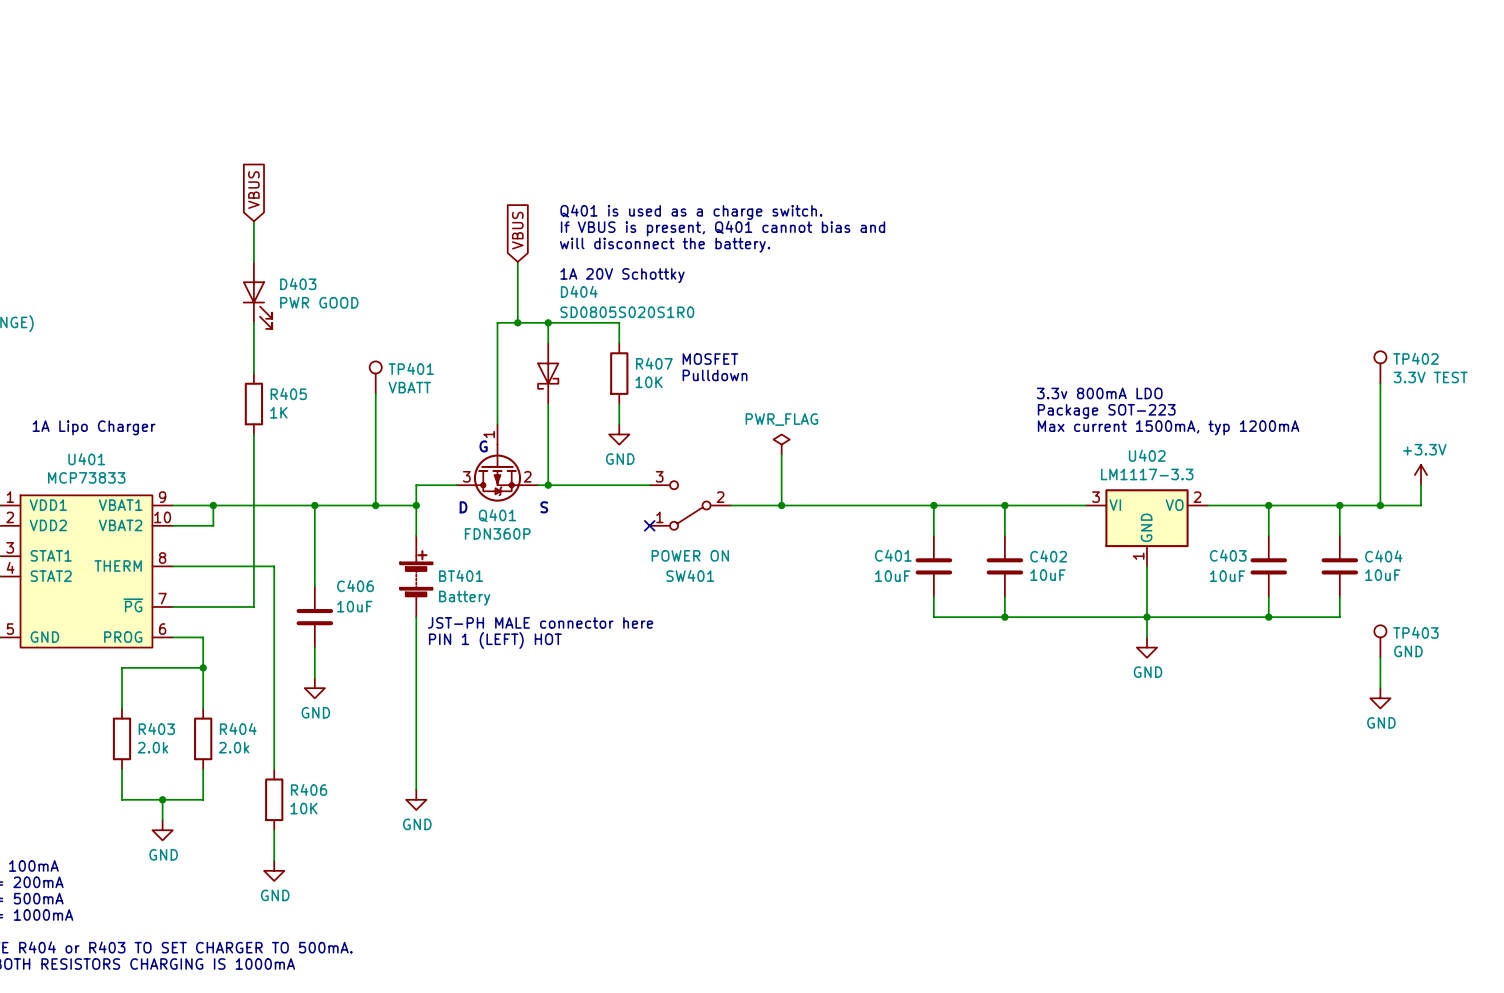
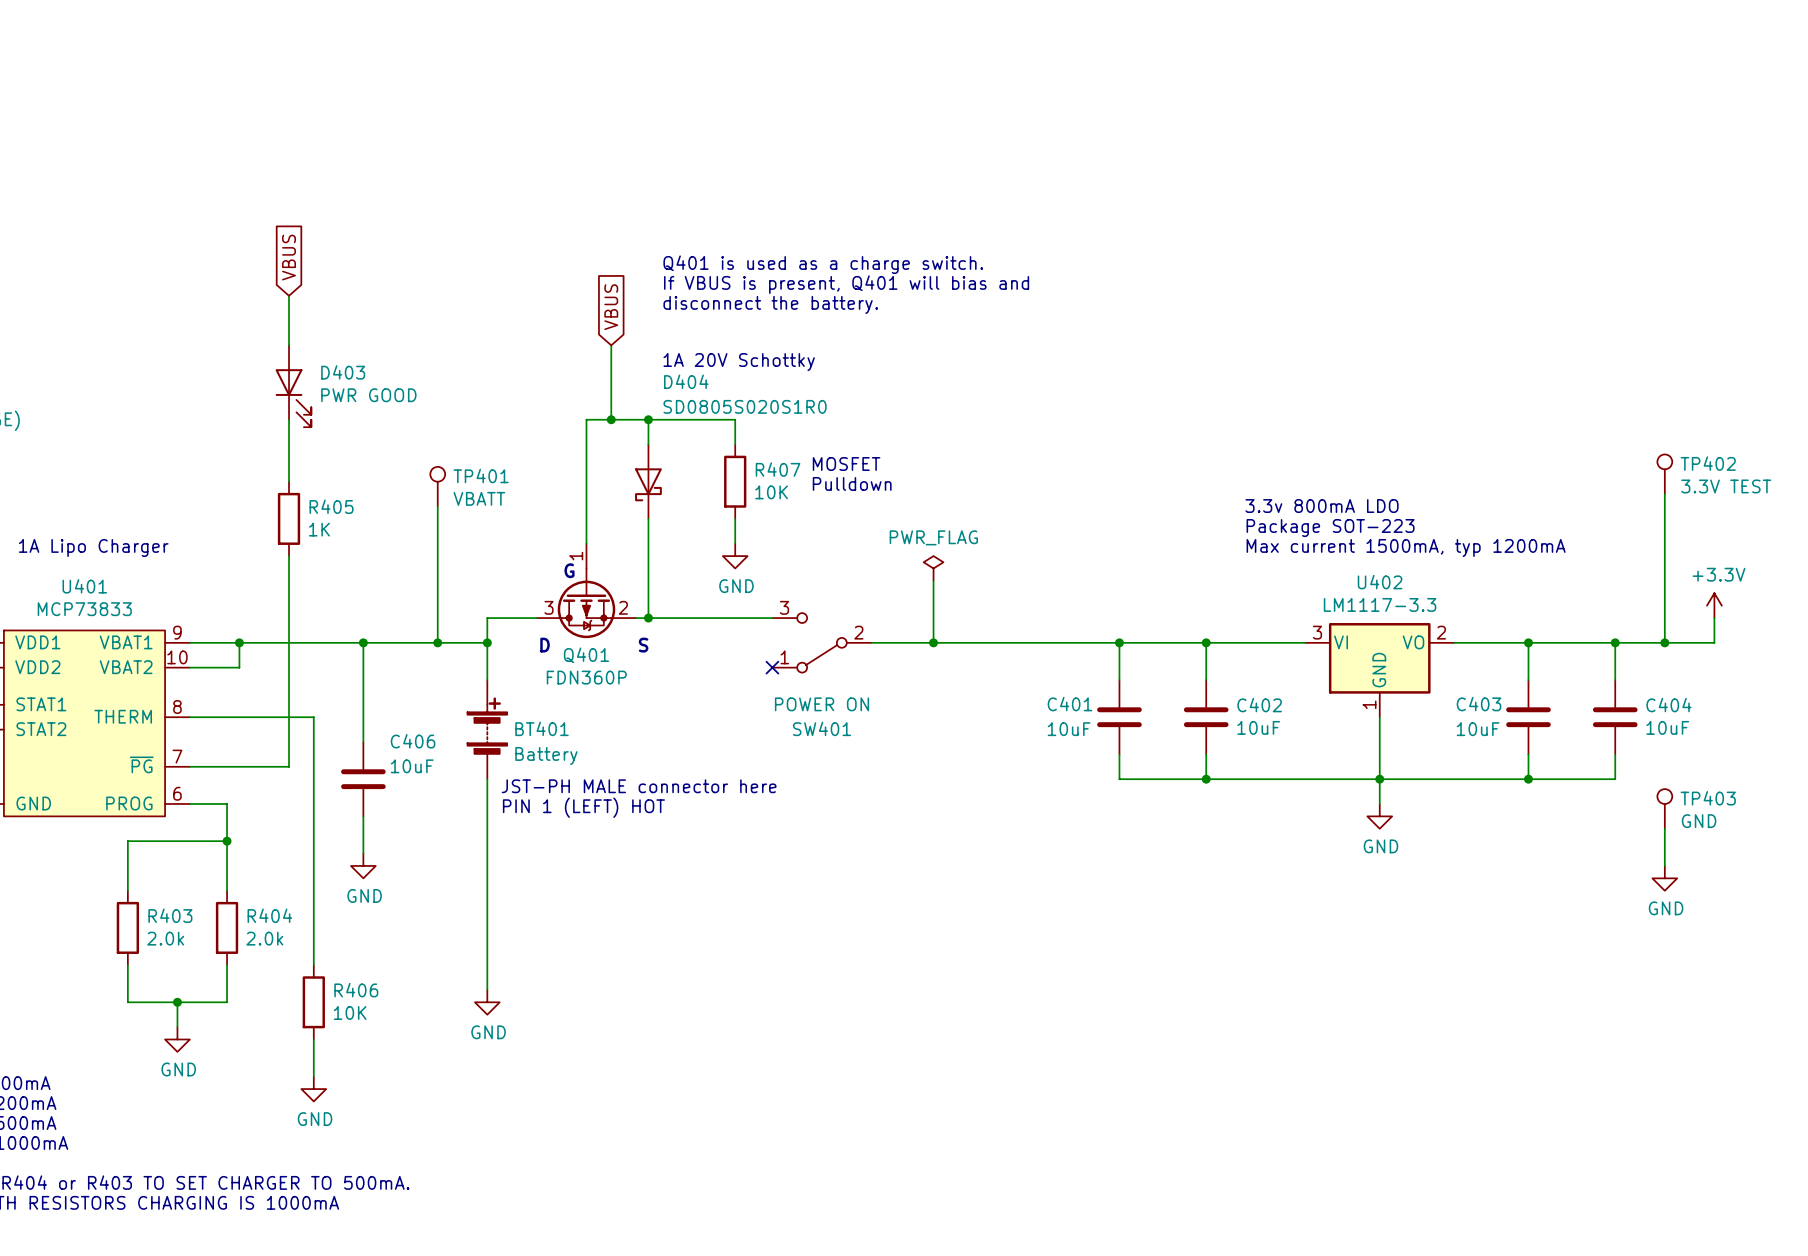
text: none -> Q401 is used as a charge switch. (823, 264)
text: Q401 is used as a charge switch. (691, 212) -> If VBUS is present, Q401 will bias and (846, 284)
text: If VBUS is present, Q401 cannot bias and (723, 228) -> disconnect the battery. (770, 304)
text: will disconnect the battery. (665, 245) -> none

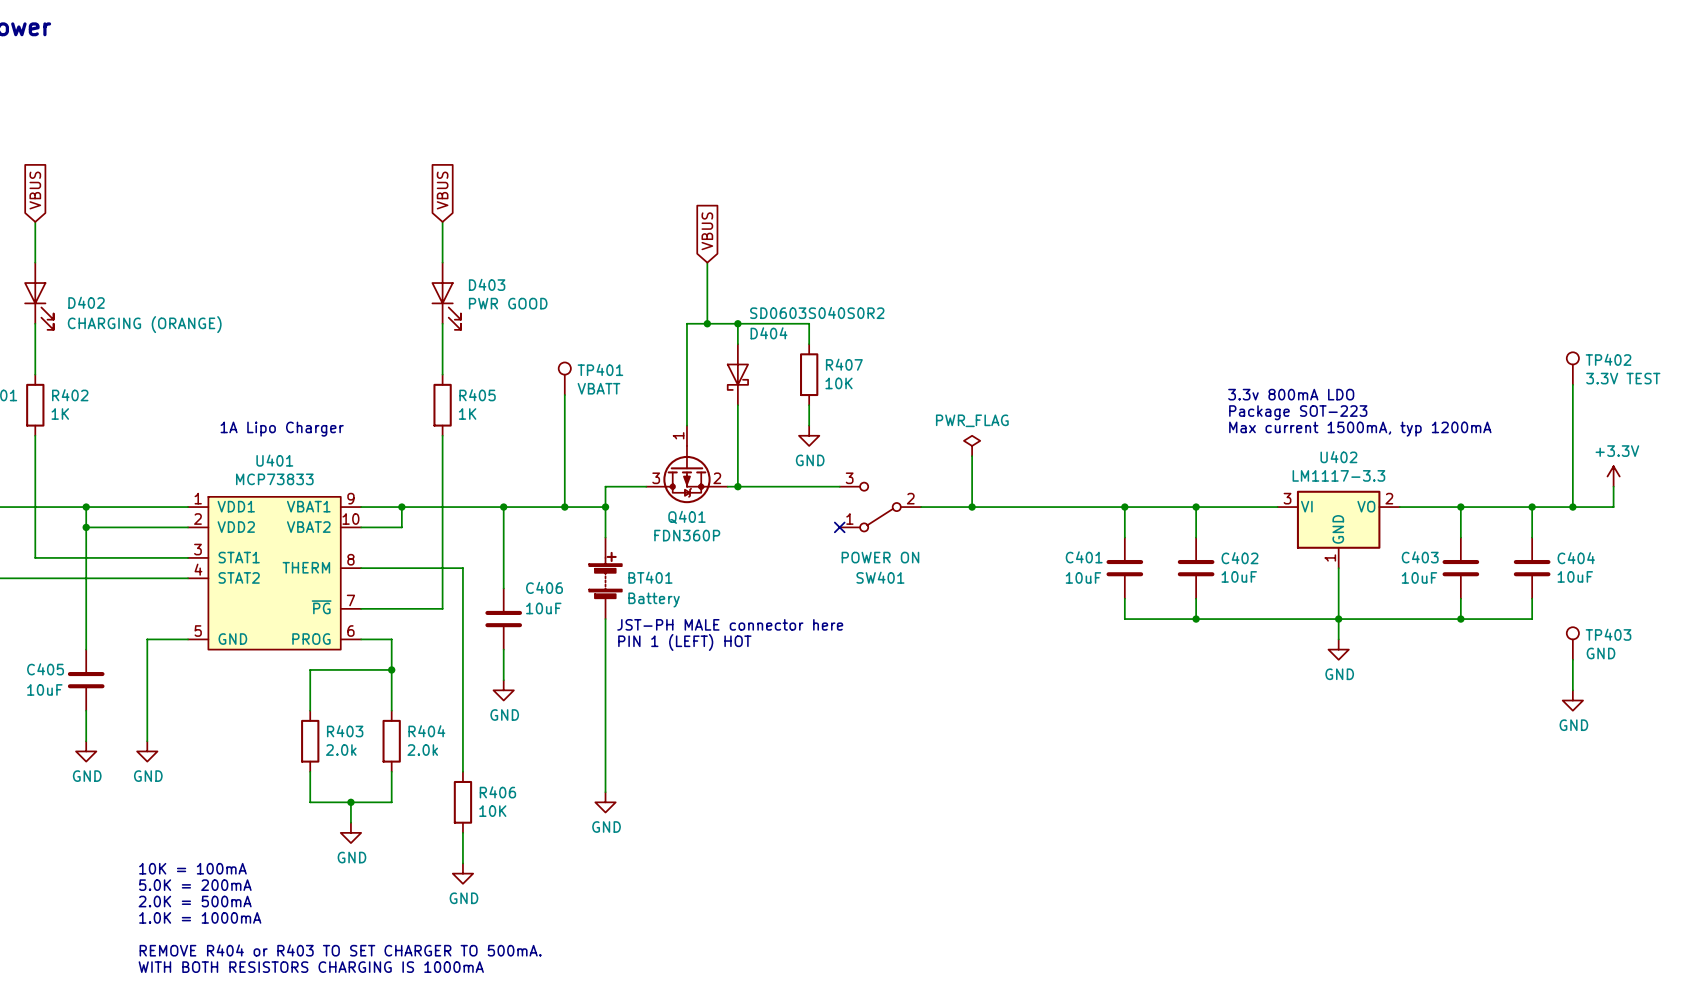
text: Q401 is used as a charge switch. (823, 264) -> none
text: If VBUS is present, Q401 will bias and (846, 284) -> none
text: disconnect the battery. (770, 304) -> none
text: 1A 20V Schottky (739, 362) -> none
D404 name position: D404 (686, 381) -> D404 (769, 333)
D404 value: SD0805S020S1R0 (745, 406) -> SD0603S040S0R2 (817, 312)
text: MOSFET (846, 464) -> none
text: Pulldown (852, 483) -> none
text: G (569, 570) -> none
text: D (545, 645) -> none
text: S (643, 645) -> none

